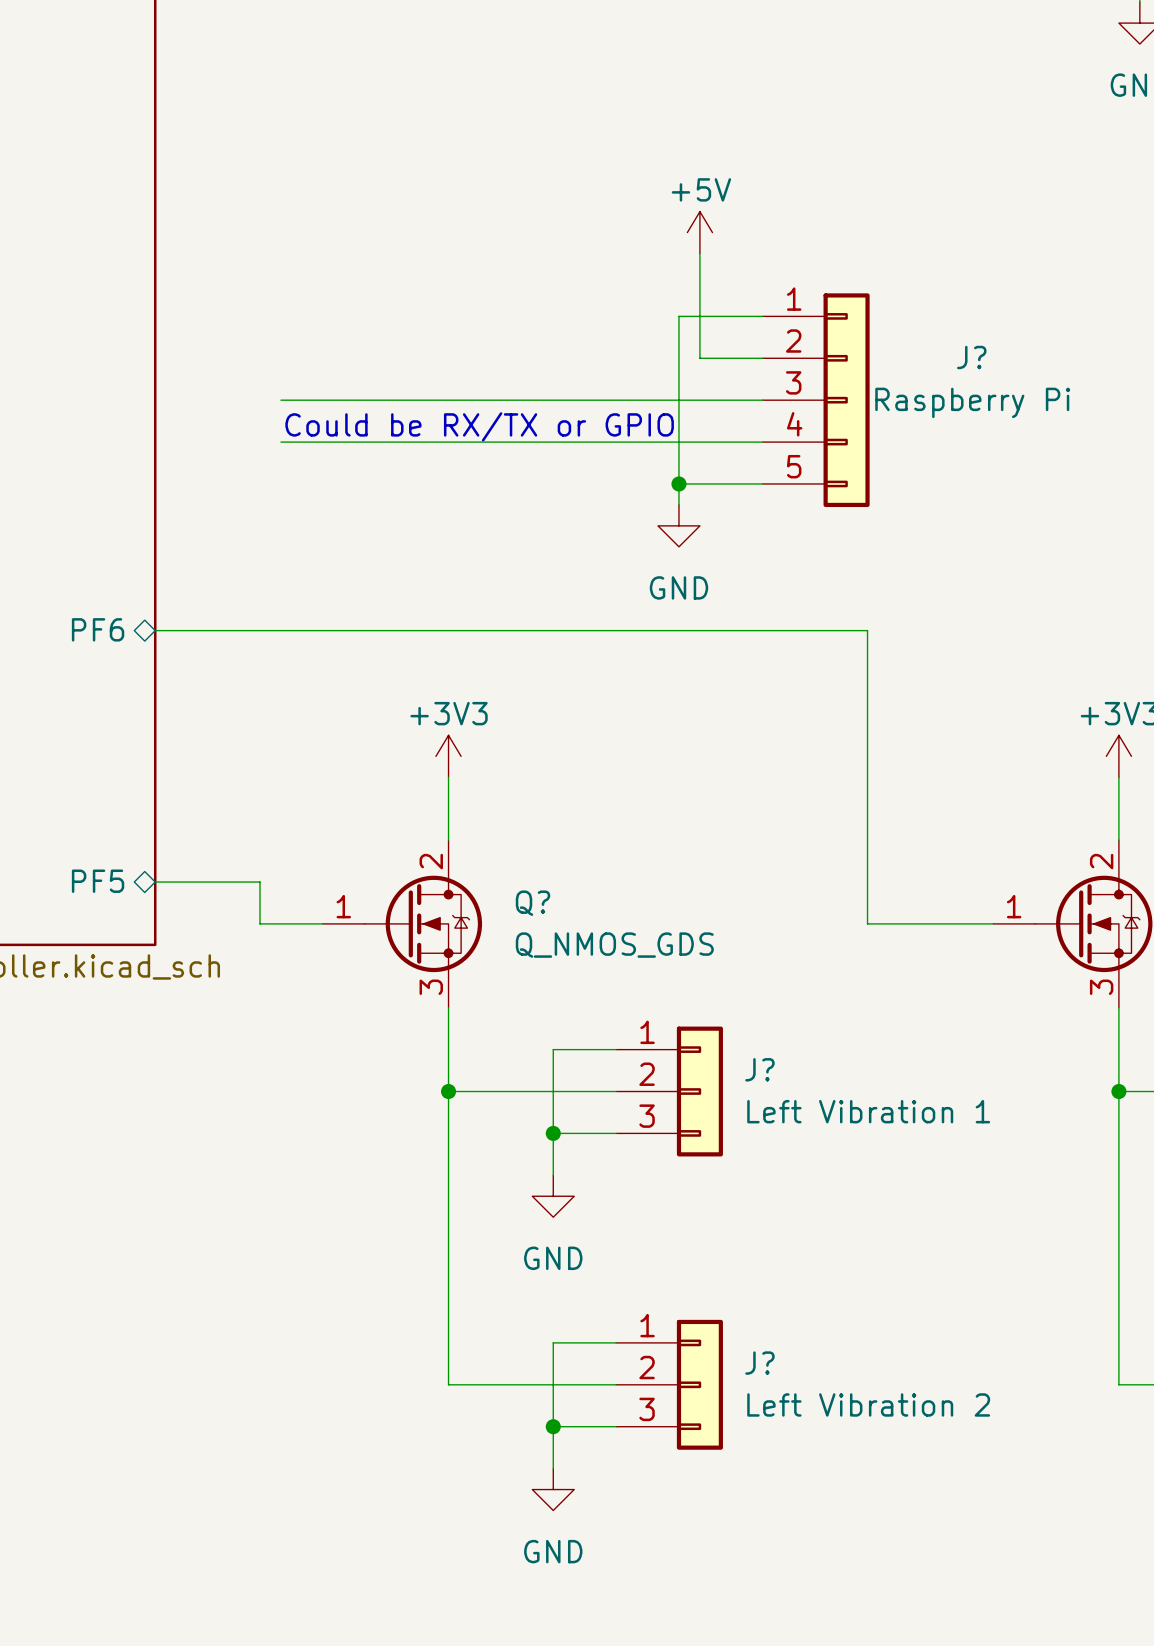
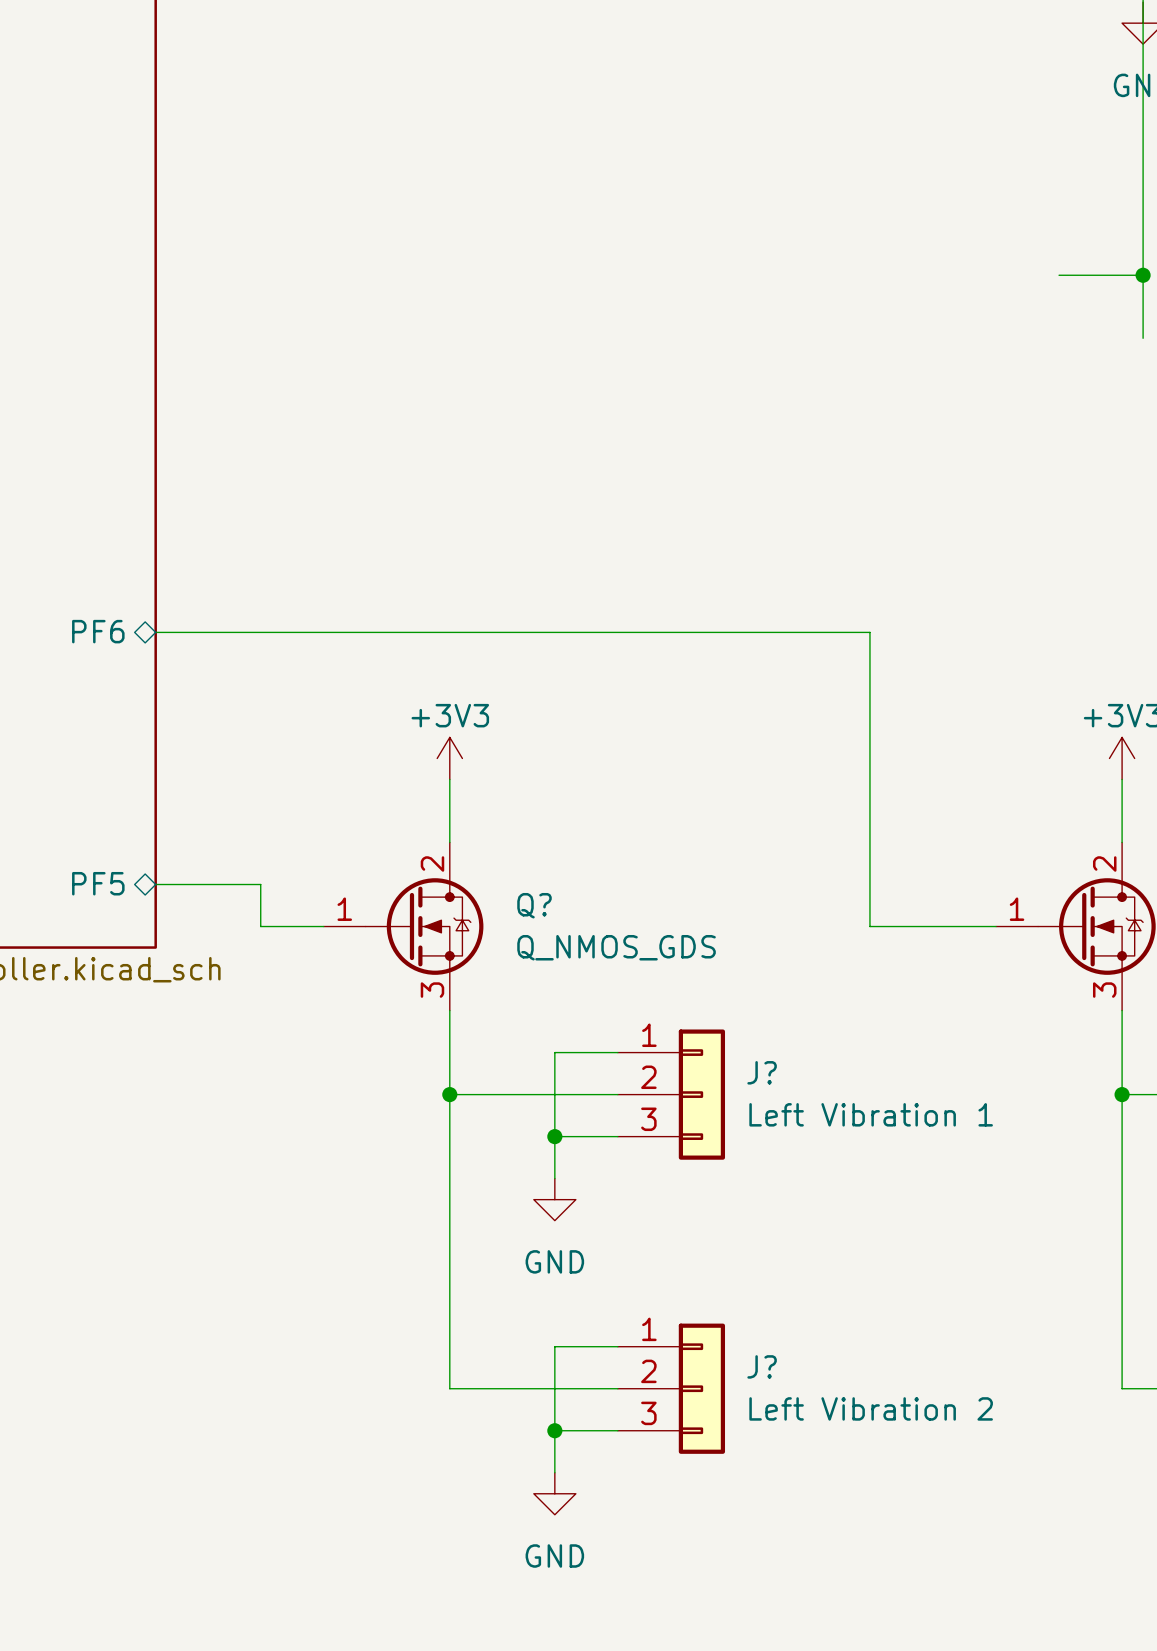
wire: none -> (1143, 2) (1143, 338)
power symbol: +5V (699, 232) -> none
wire: (699, 253) (699, 358) (762, 358) -> none
wire: none -> (1059, 275) (1143, 275)
junction: none -> (1143, 275)
wire: (762, 316) (678, 316) (678, 504) -> none
wire: (280, 400) (762, 400) -> none
J?: Raspberry Pi (816, 400) -> none
text: Could be RX/TX or GPIO (479, 426) -> none
wire: (280, 442) (762, 442) -> none
wire: (678, 483) (762, 483) -> none
junction: (678, 483) -> none
power symbol: GND (678, 525) -> none

